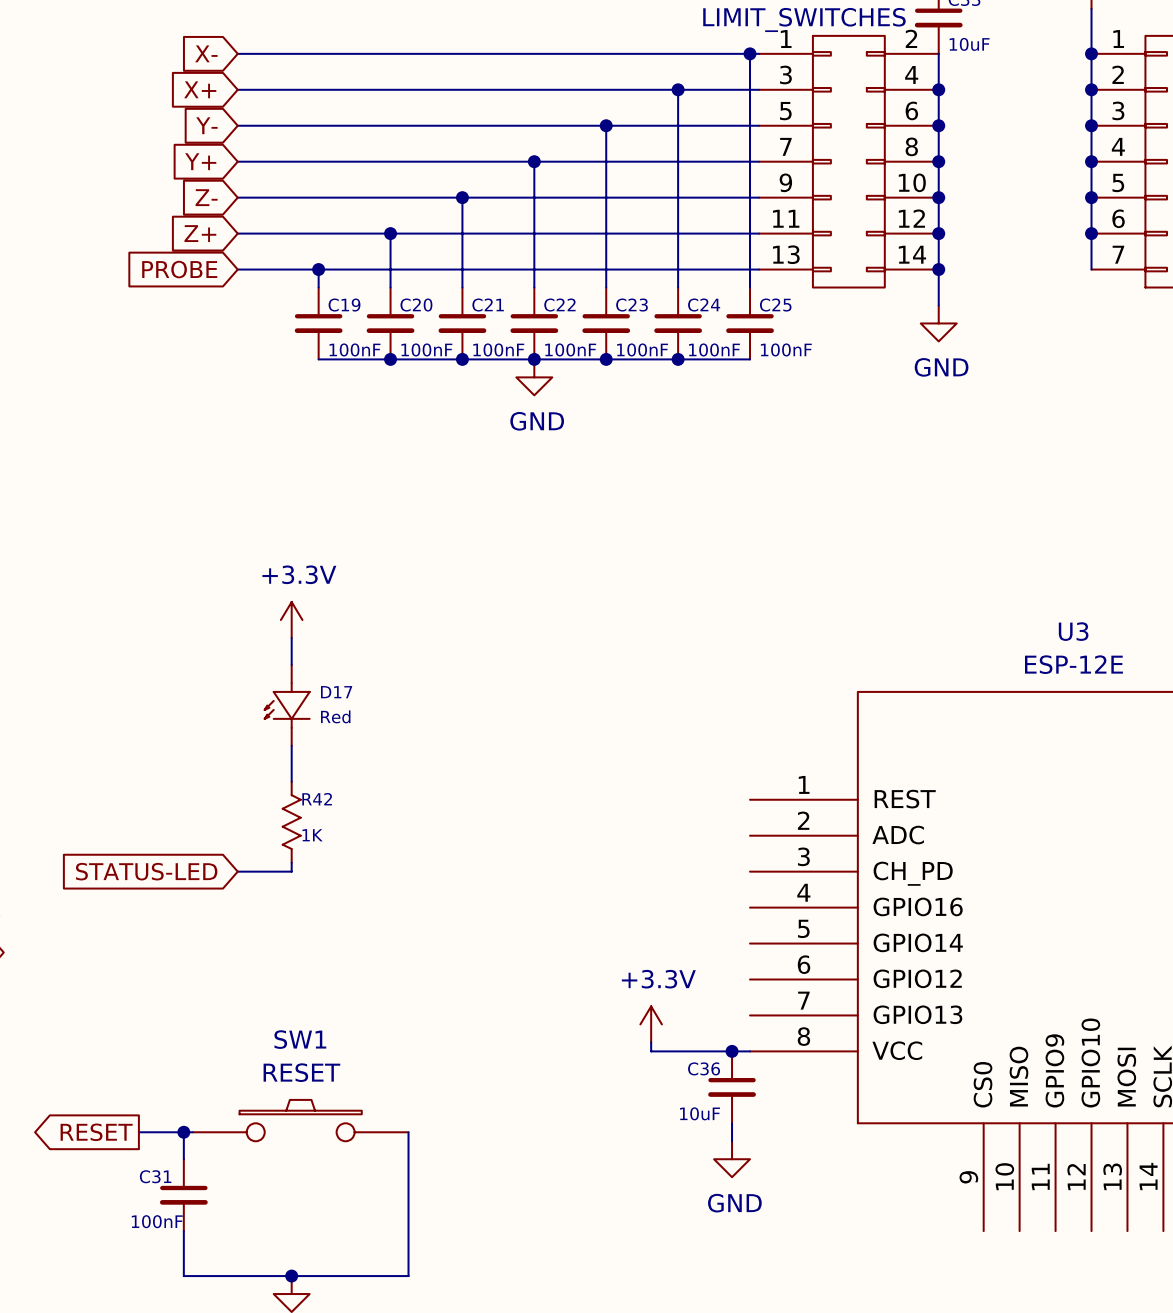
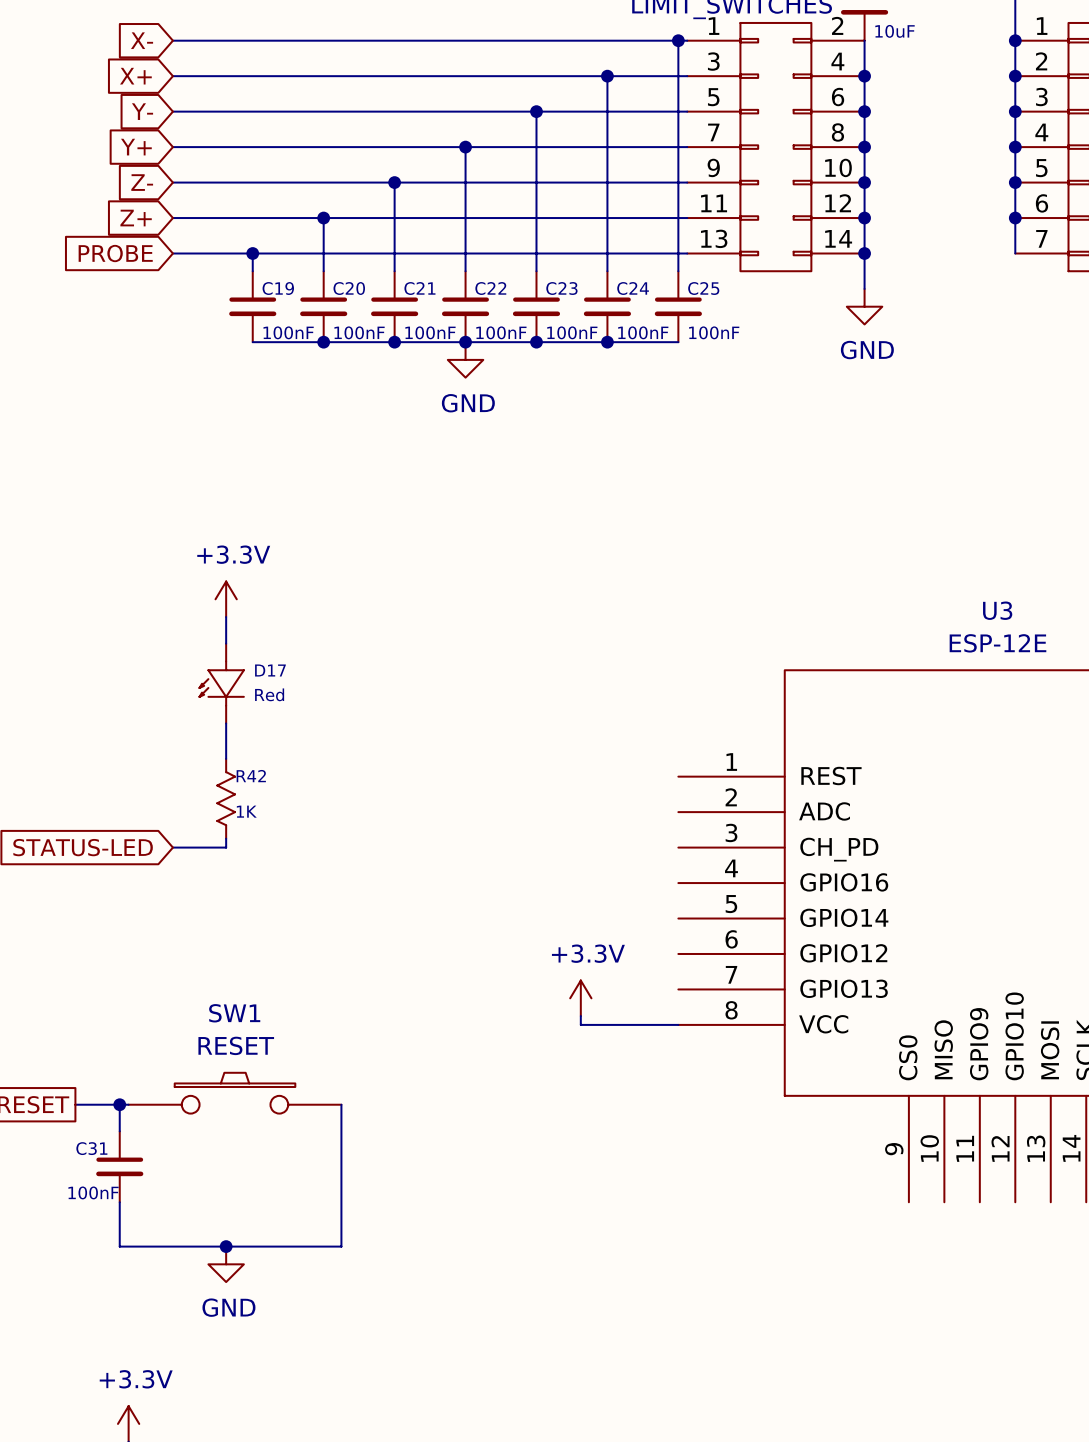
junction: (732, 1051) -> none
C36: 10uF (732, 1087) -> none
wire: (732, 1123) (732, 1141) -> none
power symbol: GND (732, 1159) -> none

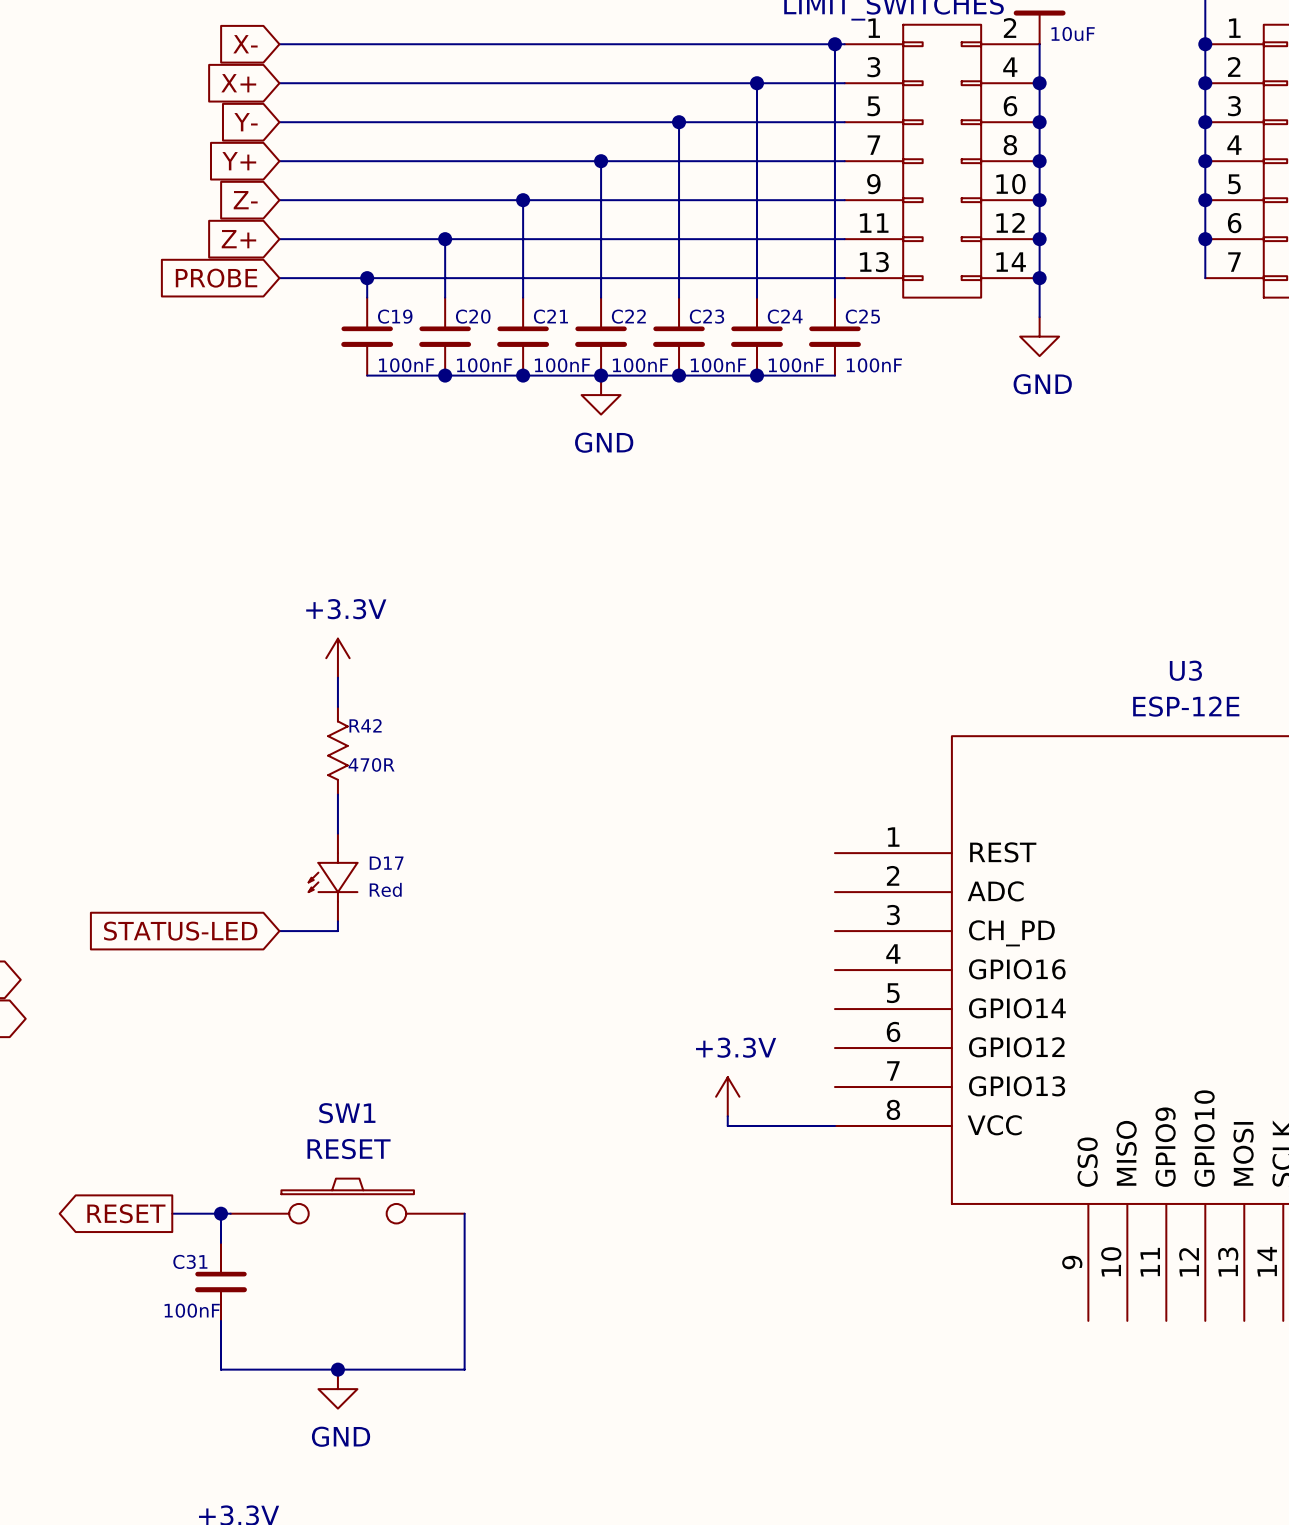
D17 position: (221, 683) -> (333, 877)
R42 position: (226, 798) -> (337, 750)
R42 value: 1K (246, 811) -> 470R (371, 764)

